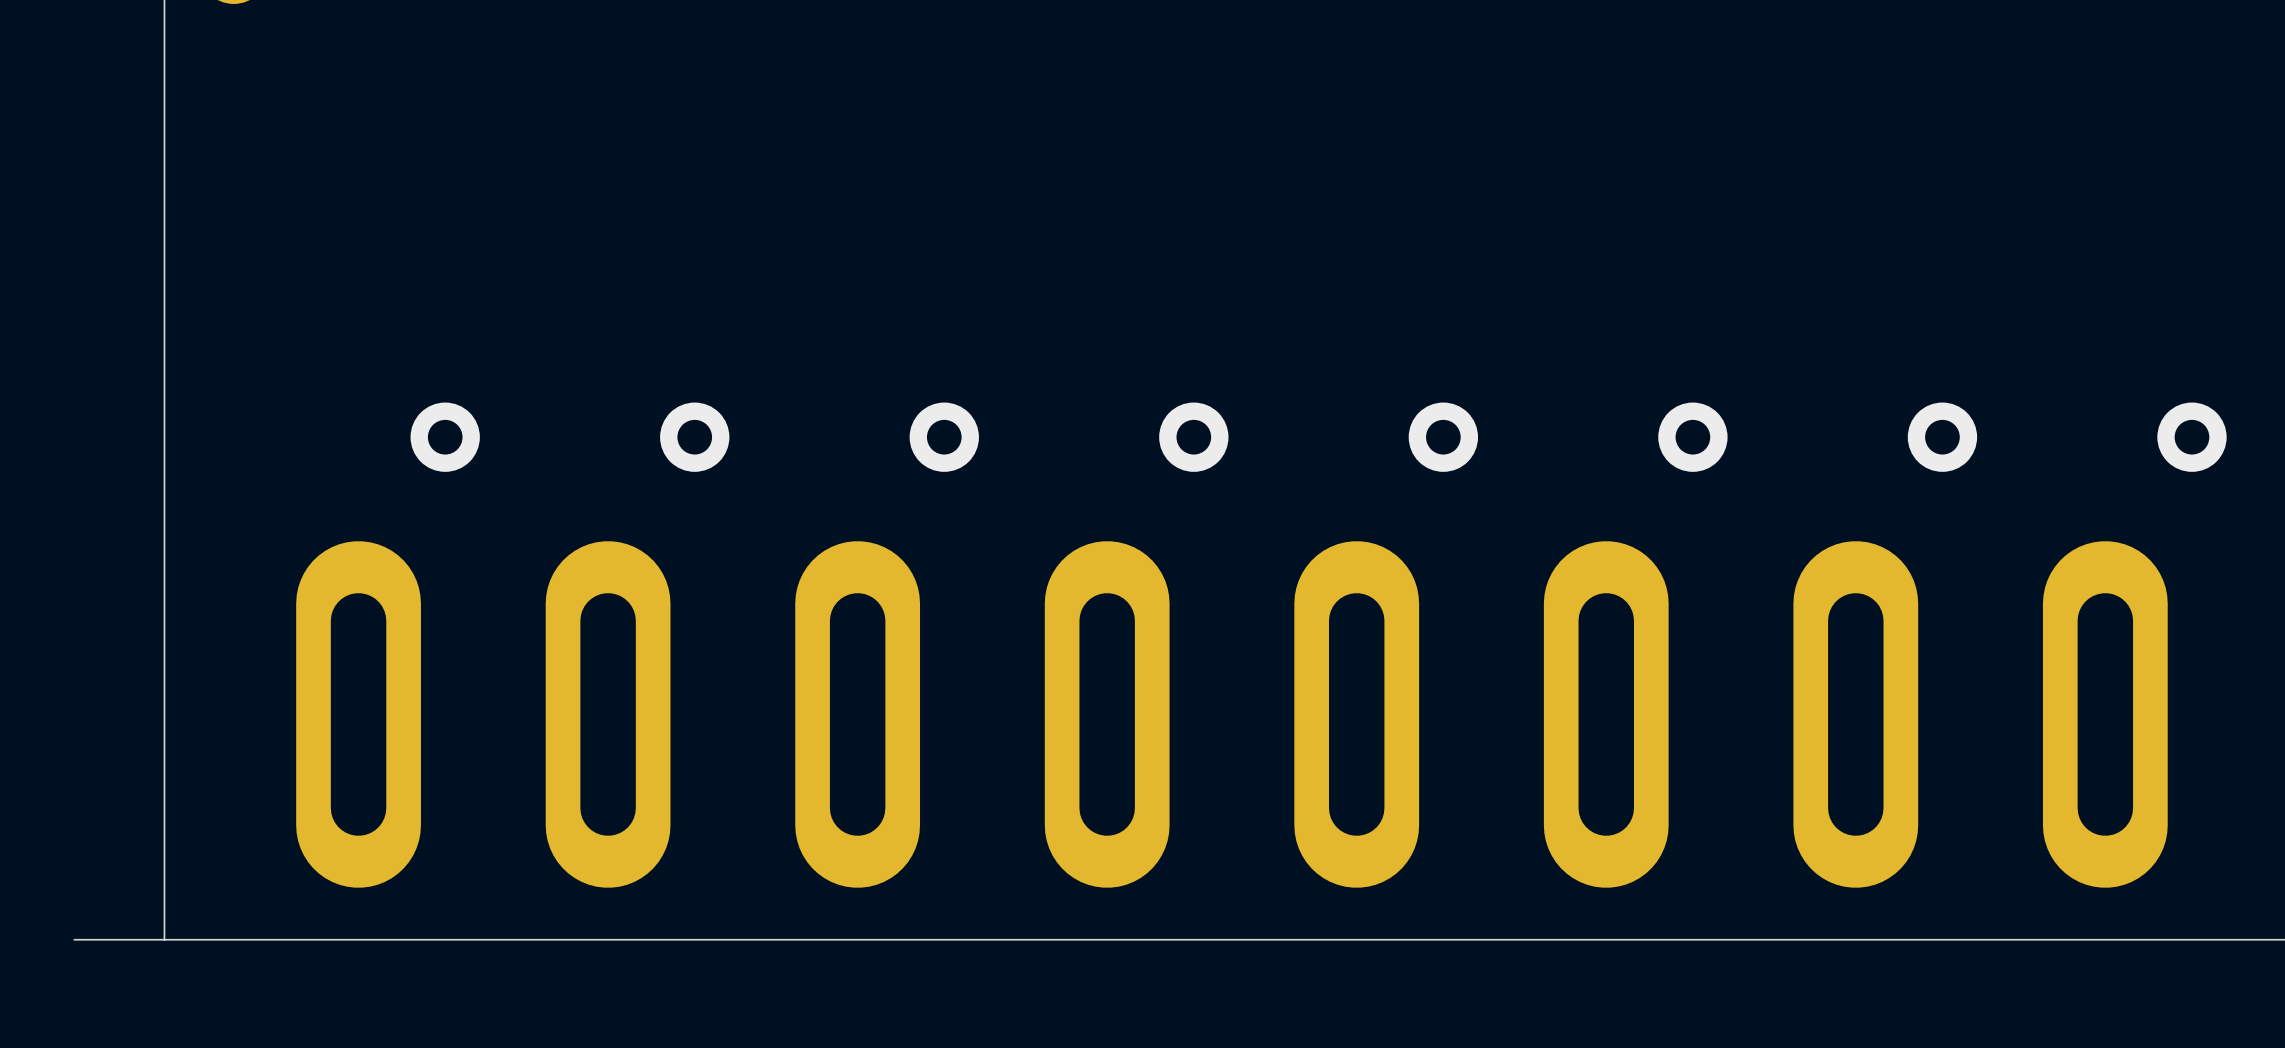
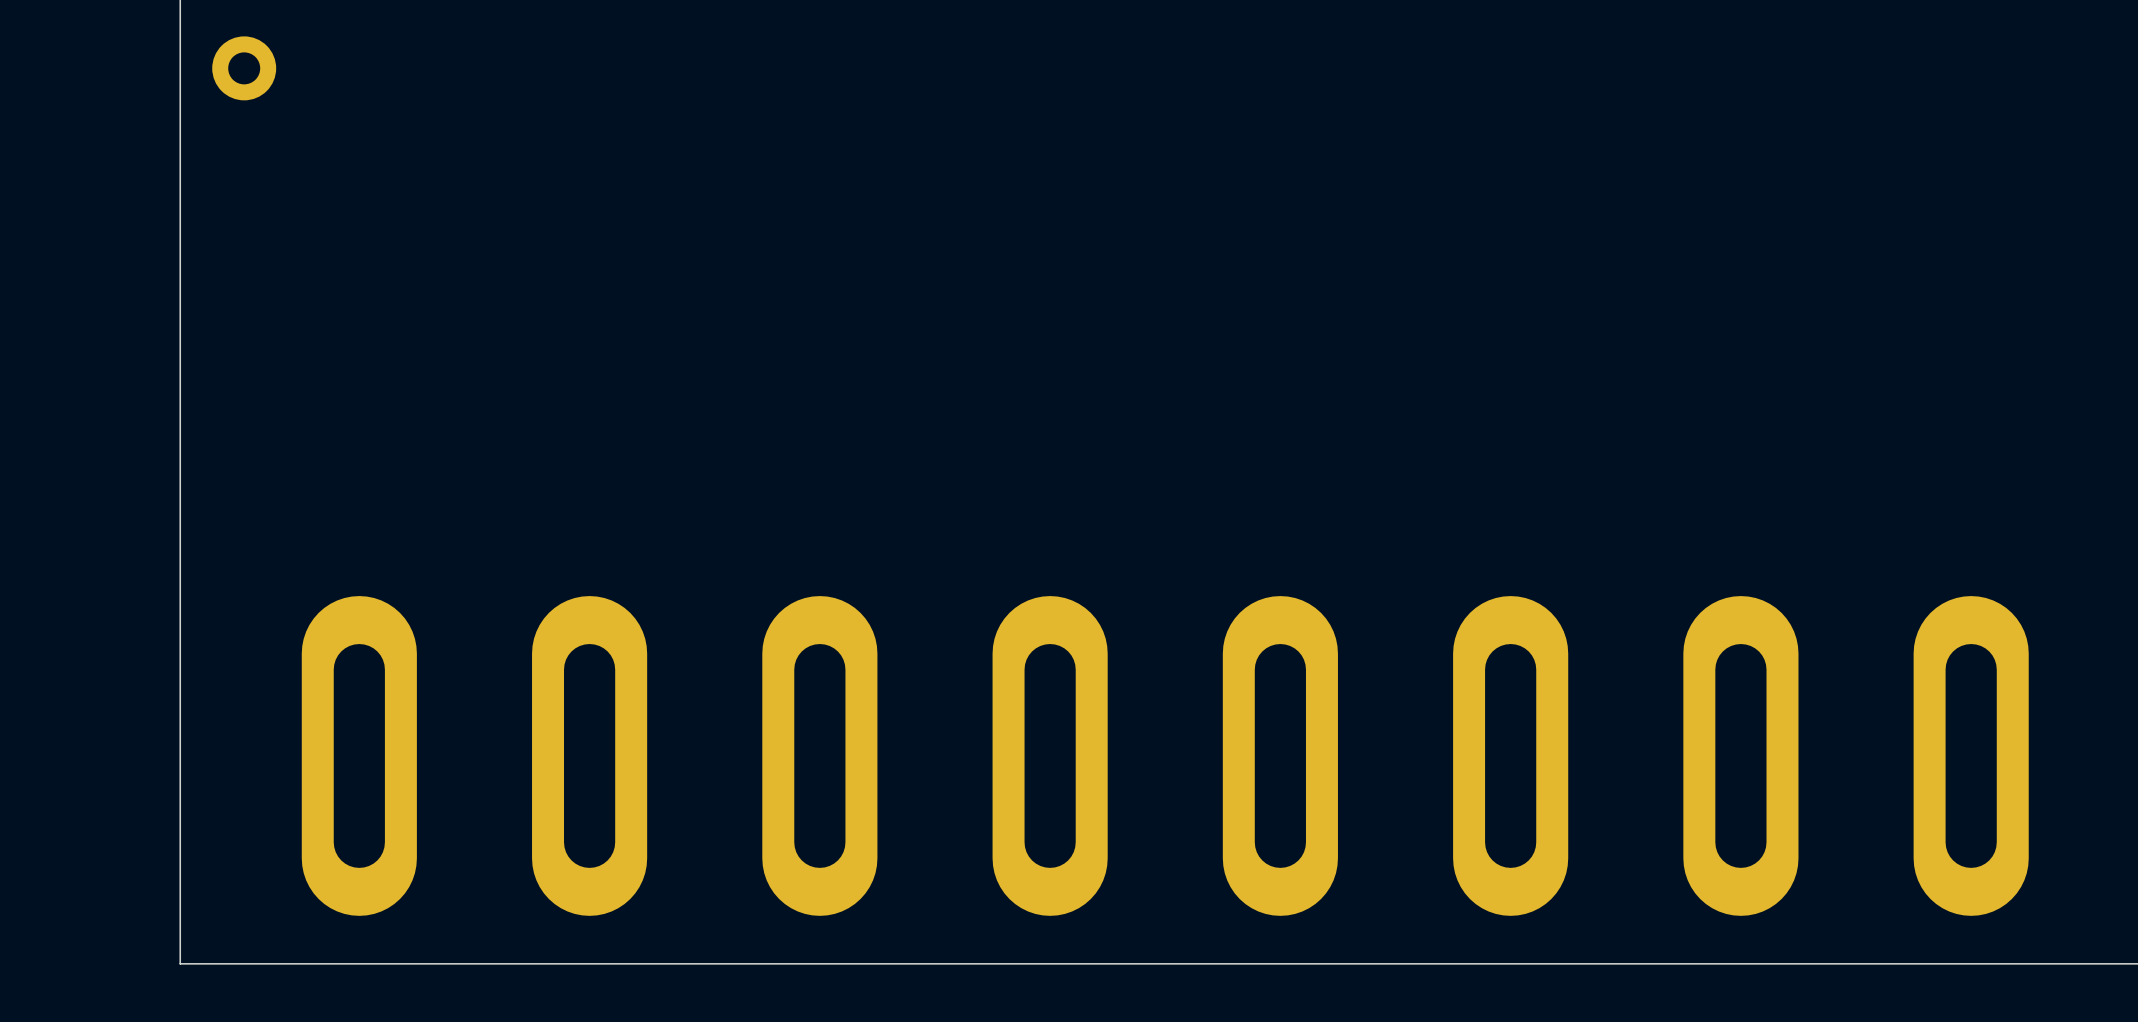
via: (445, 437) -> none
via: (694, 437) -> none
via: (944, 437) -> none
via: (1193, 437) -> none
via: (1443, 437) -> none
via: (1692, 437) -> none
via: (1942, 437) -> none
via: (2191, 437) -> none
board edge: (164, 939) (74, 939) -> none

